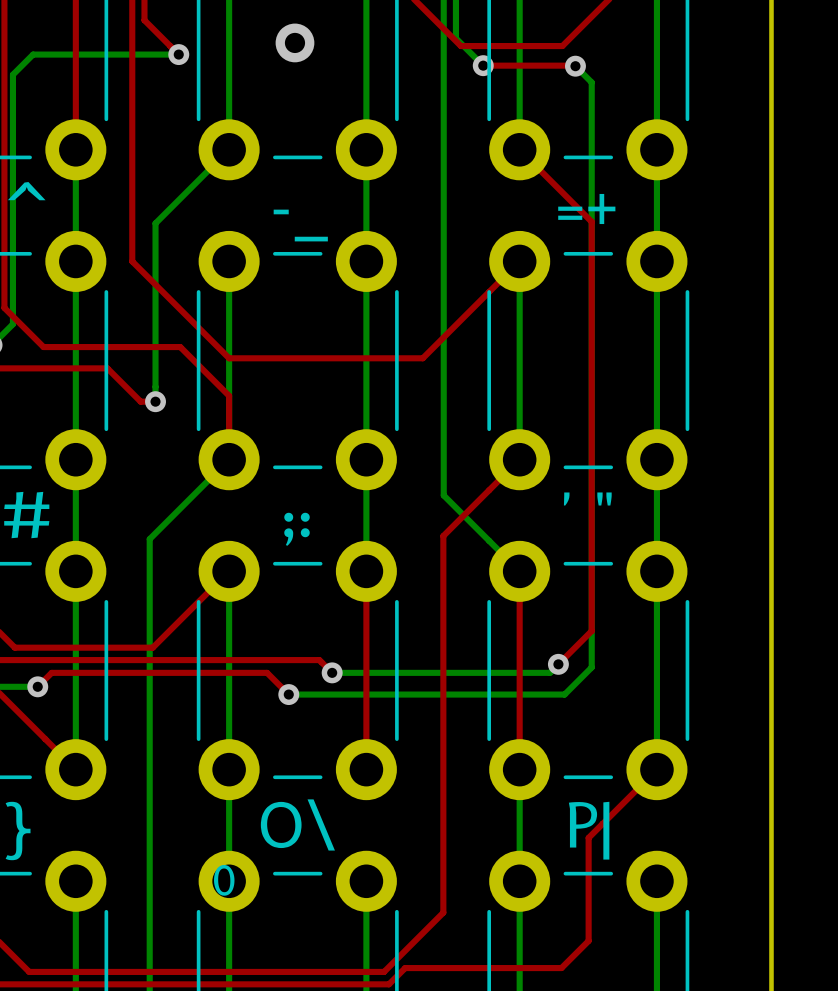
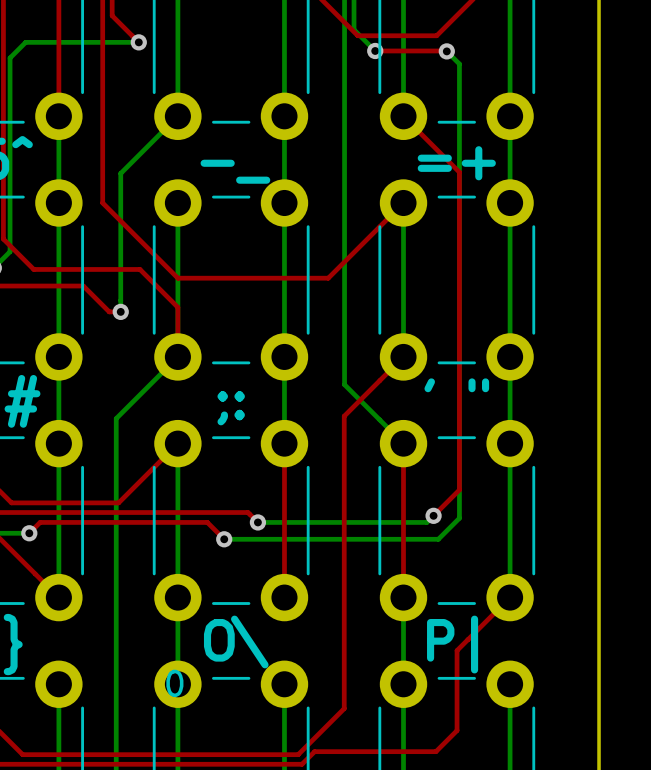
via: (294, 42) -> none

